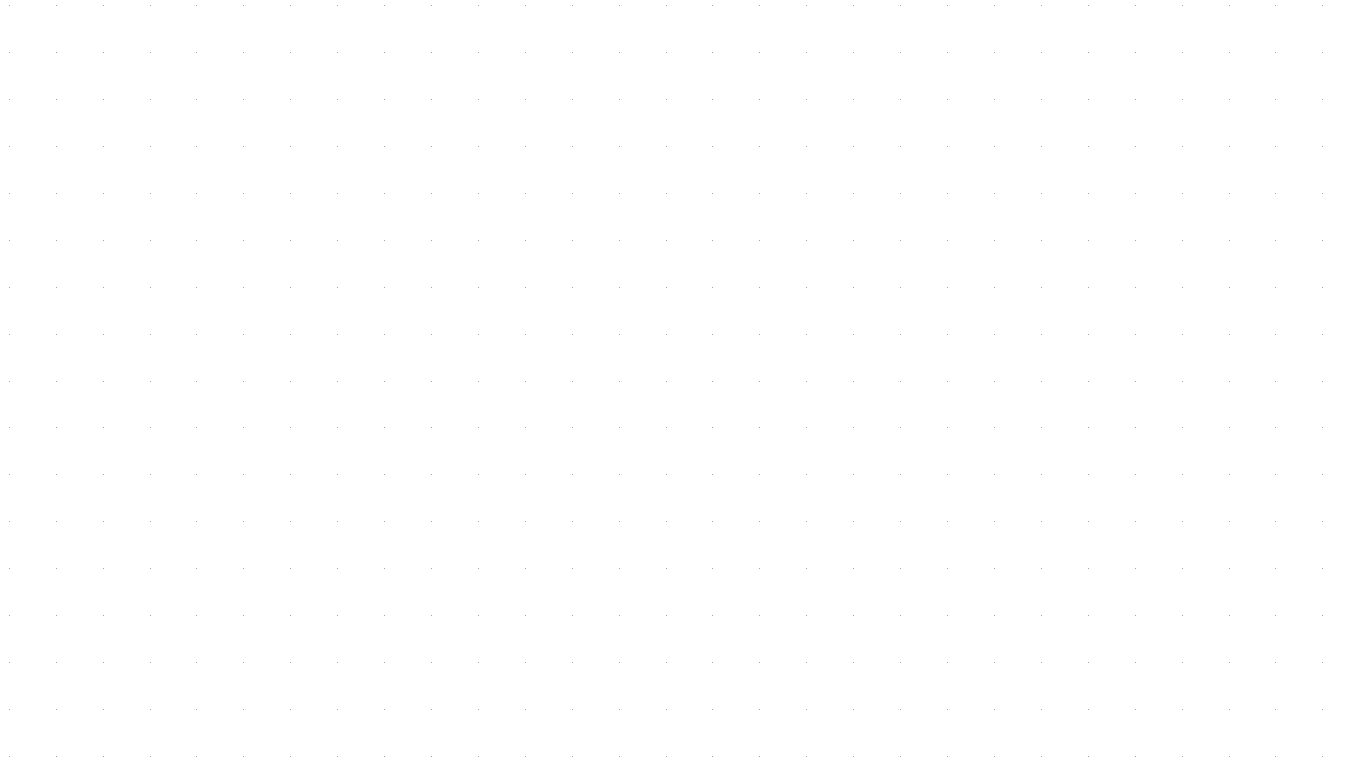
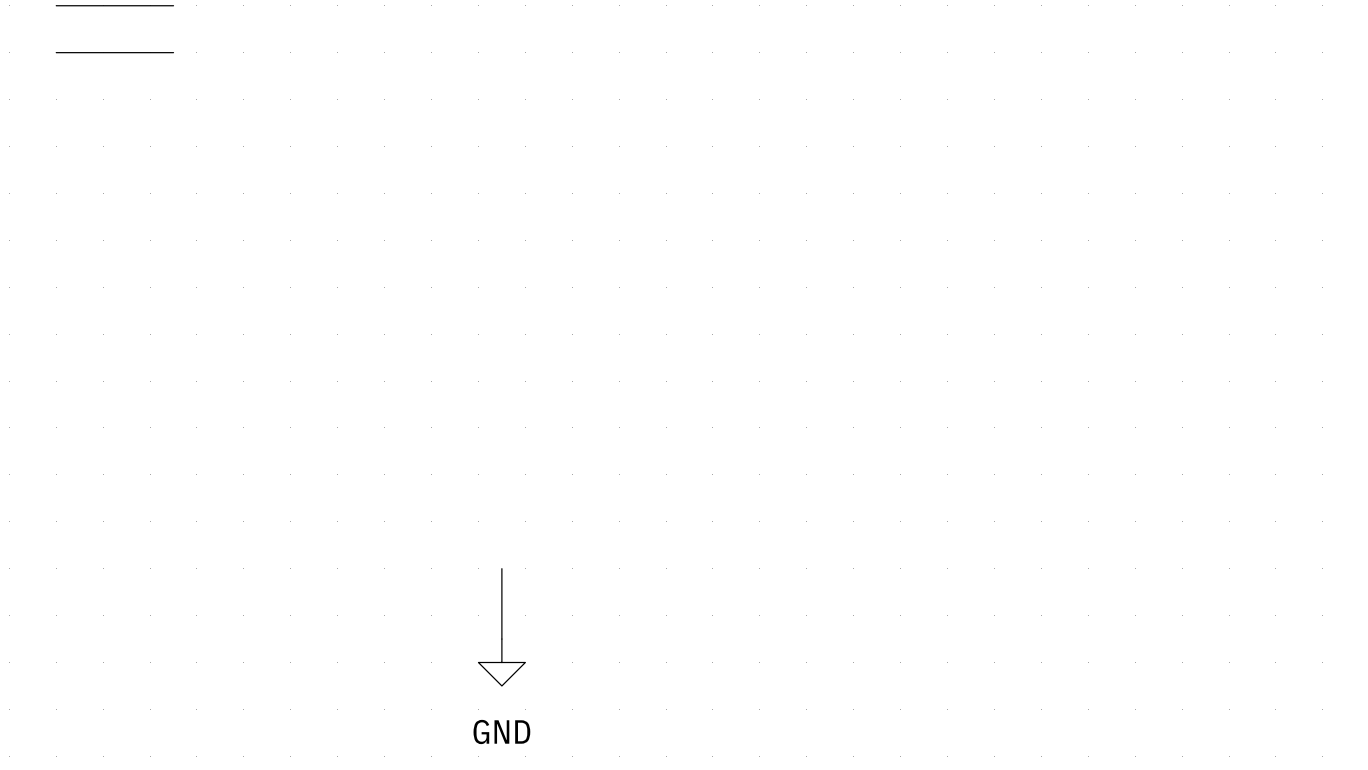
wire: none -> (56, 5) (173, 5)
wire: none -> (56, 52) (173, 52)
wire: none -> (501, 568) (501, 639)
power symbol: none -> GND (501, 662)

